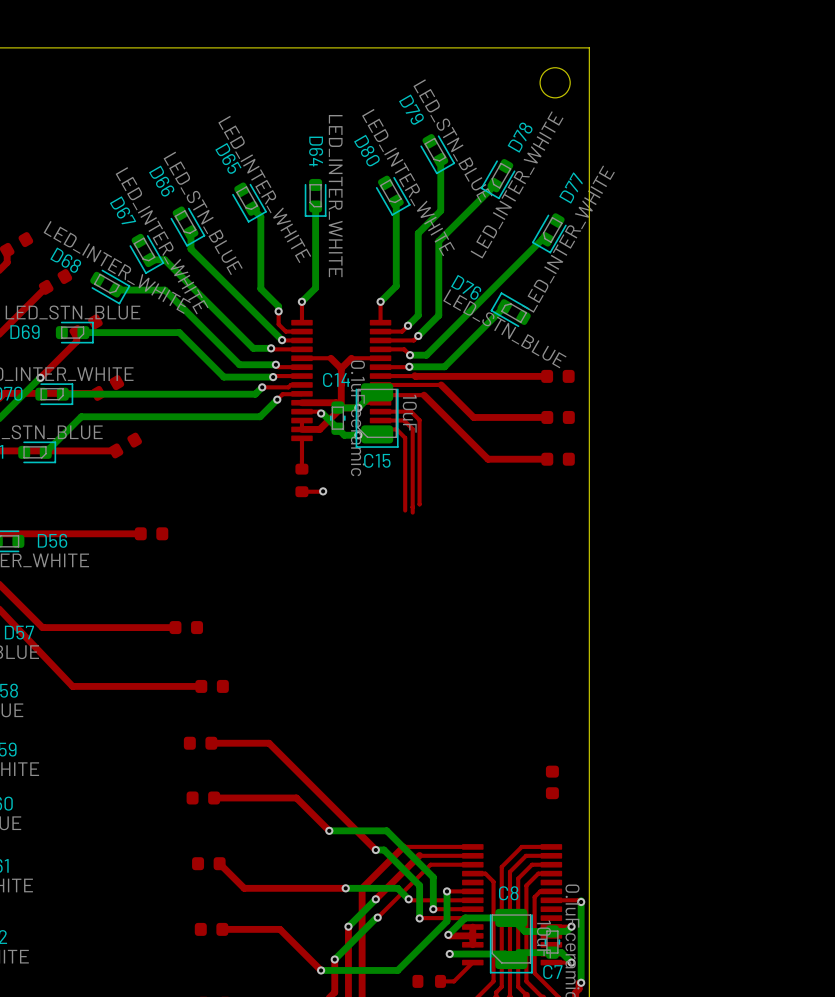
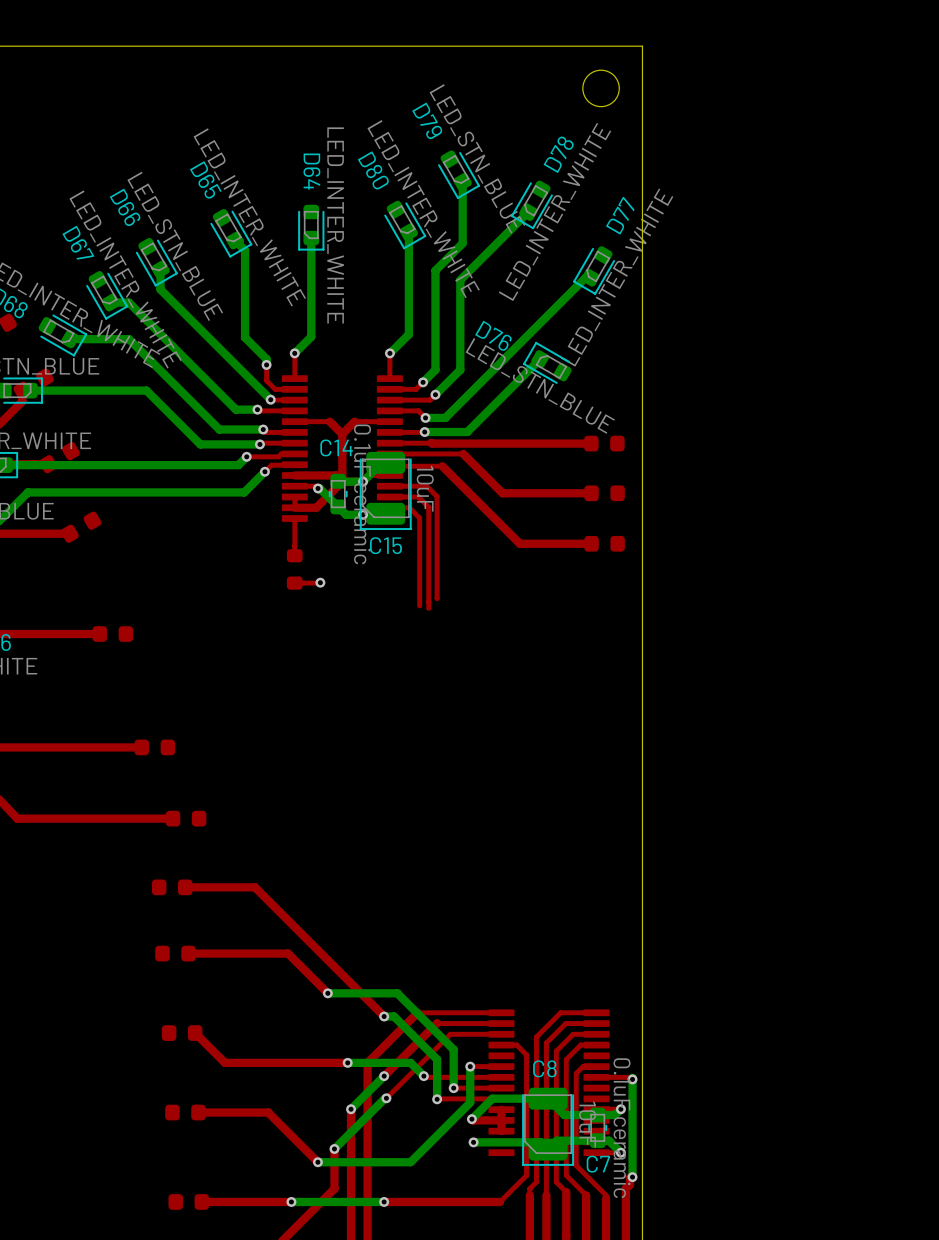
part: (552, 782) -> none
top track: (472, 962) (453, 981) (440, 981) -> none
part: (429, 981) -> none

